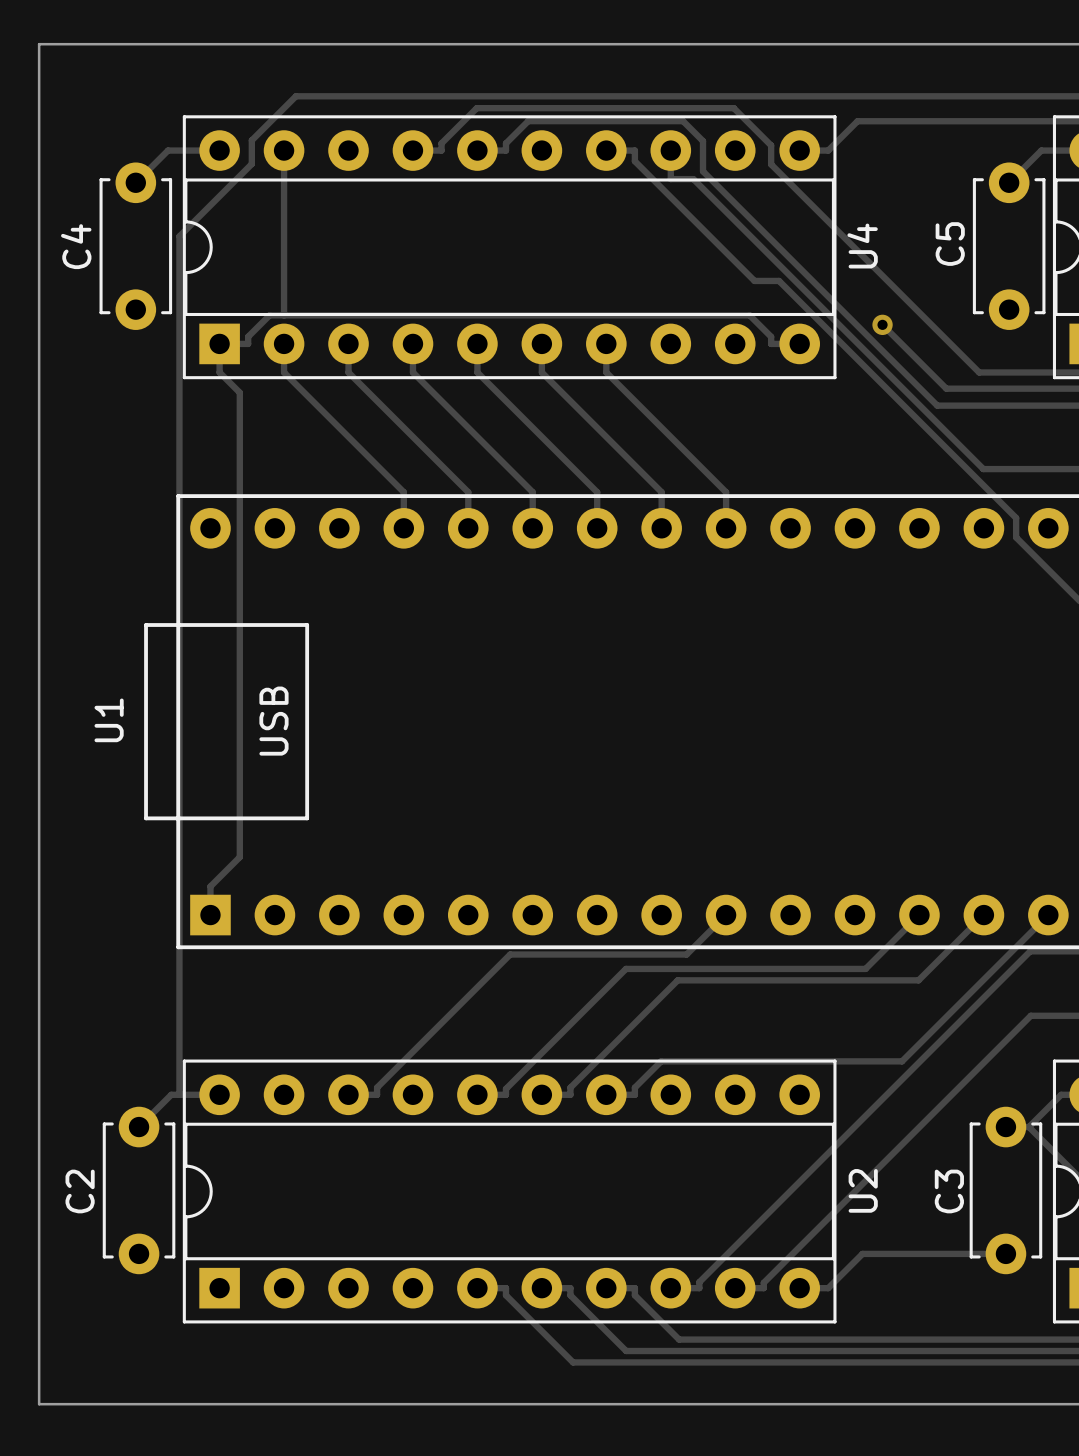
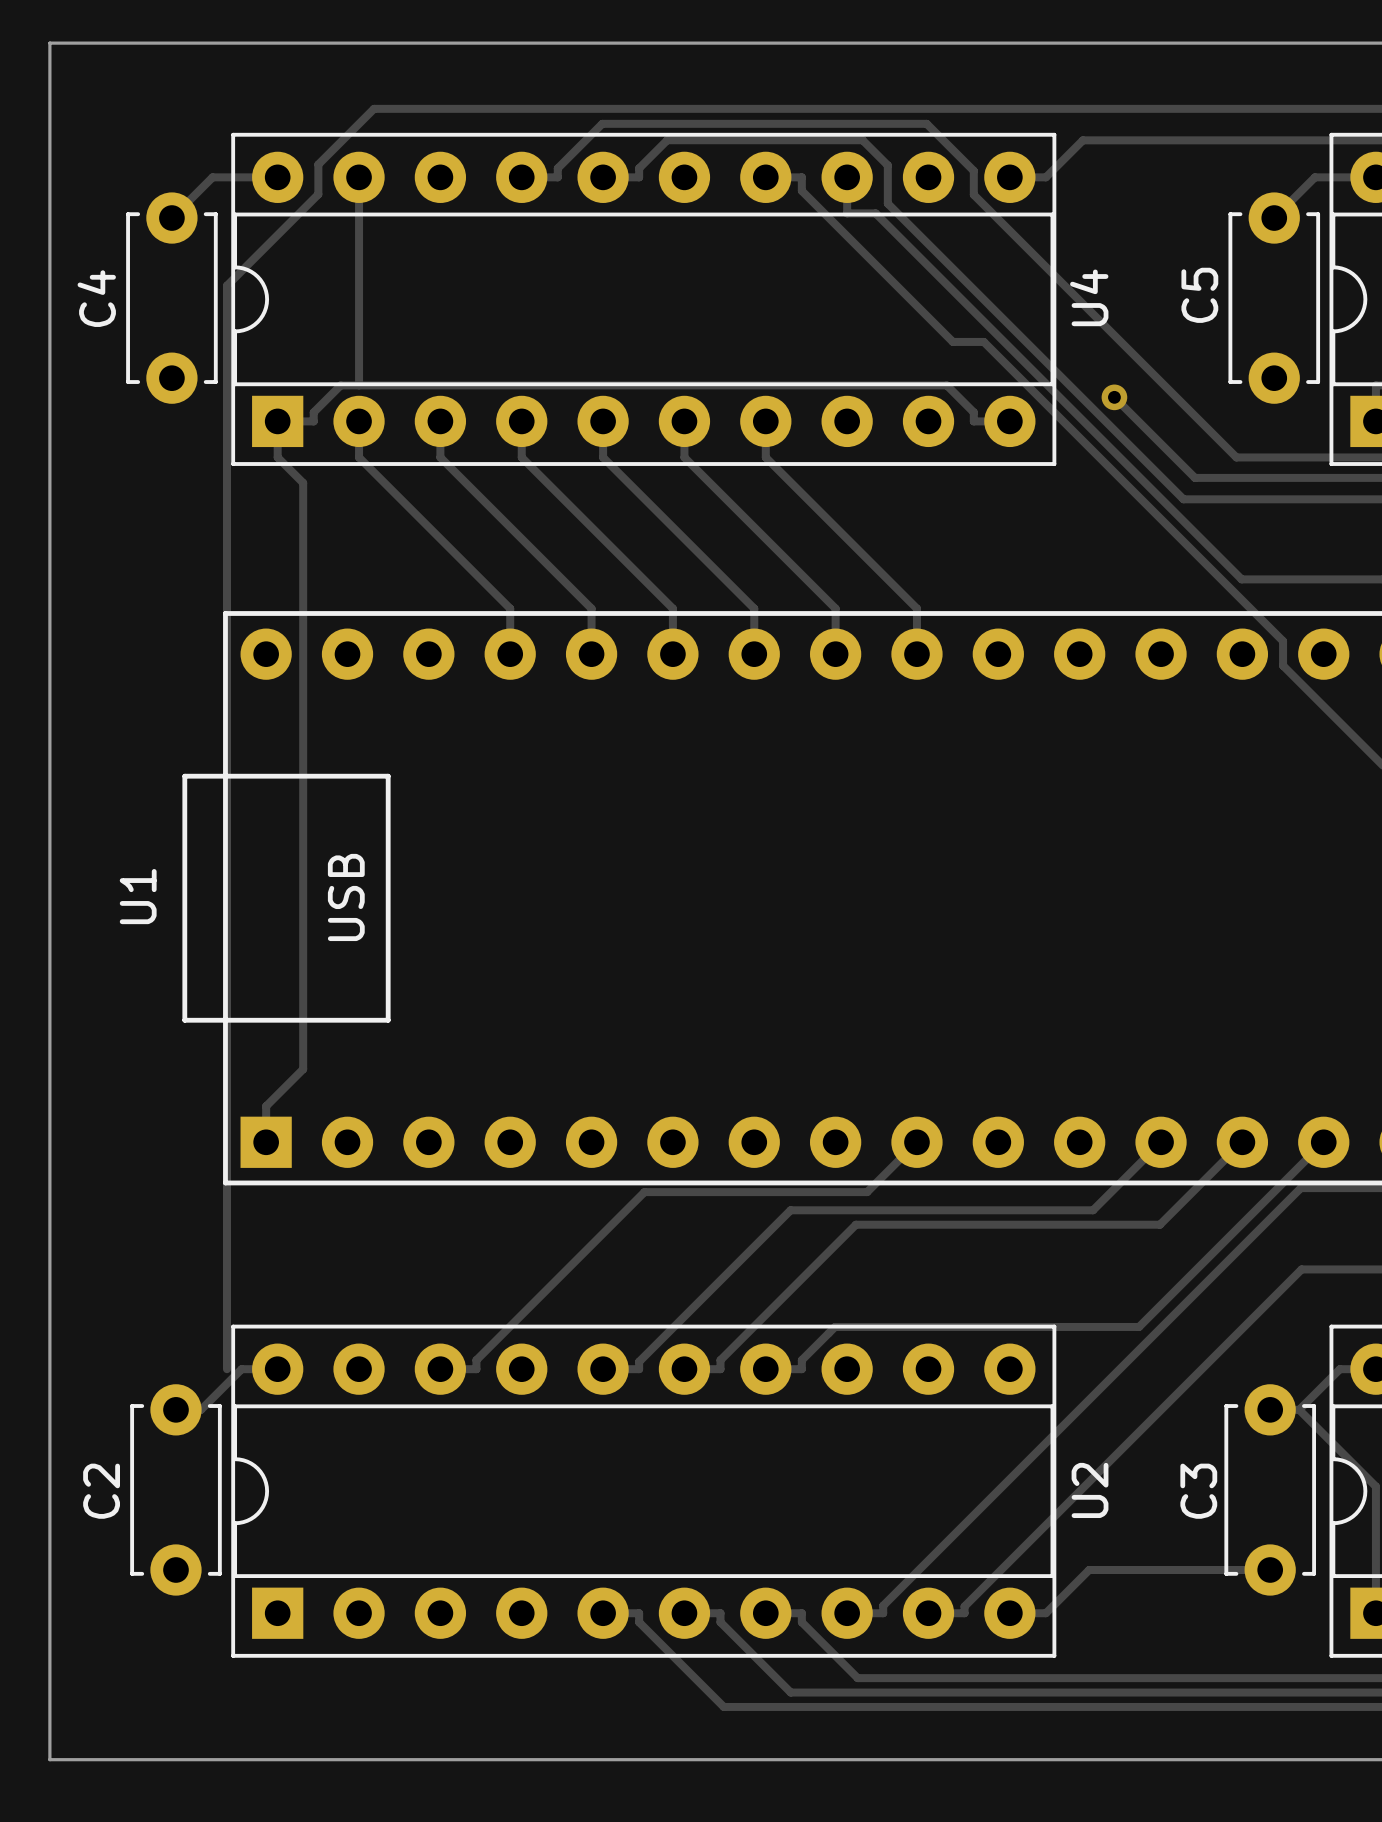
track: (191, 1094) (171, 1094) (139, 1127) -> (241, 1369) (200, 1409) (175, 1409)

